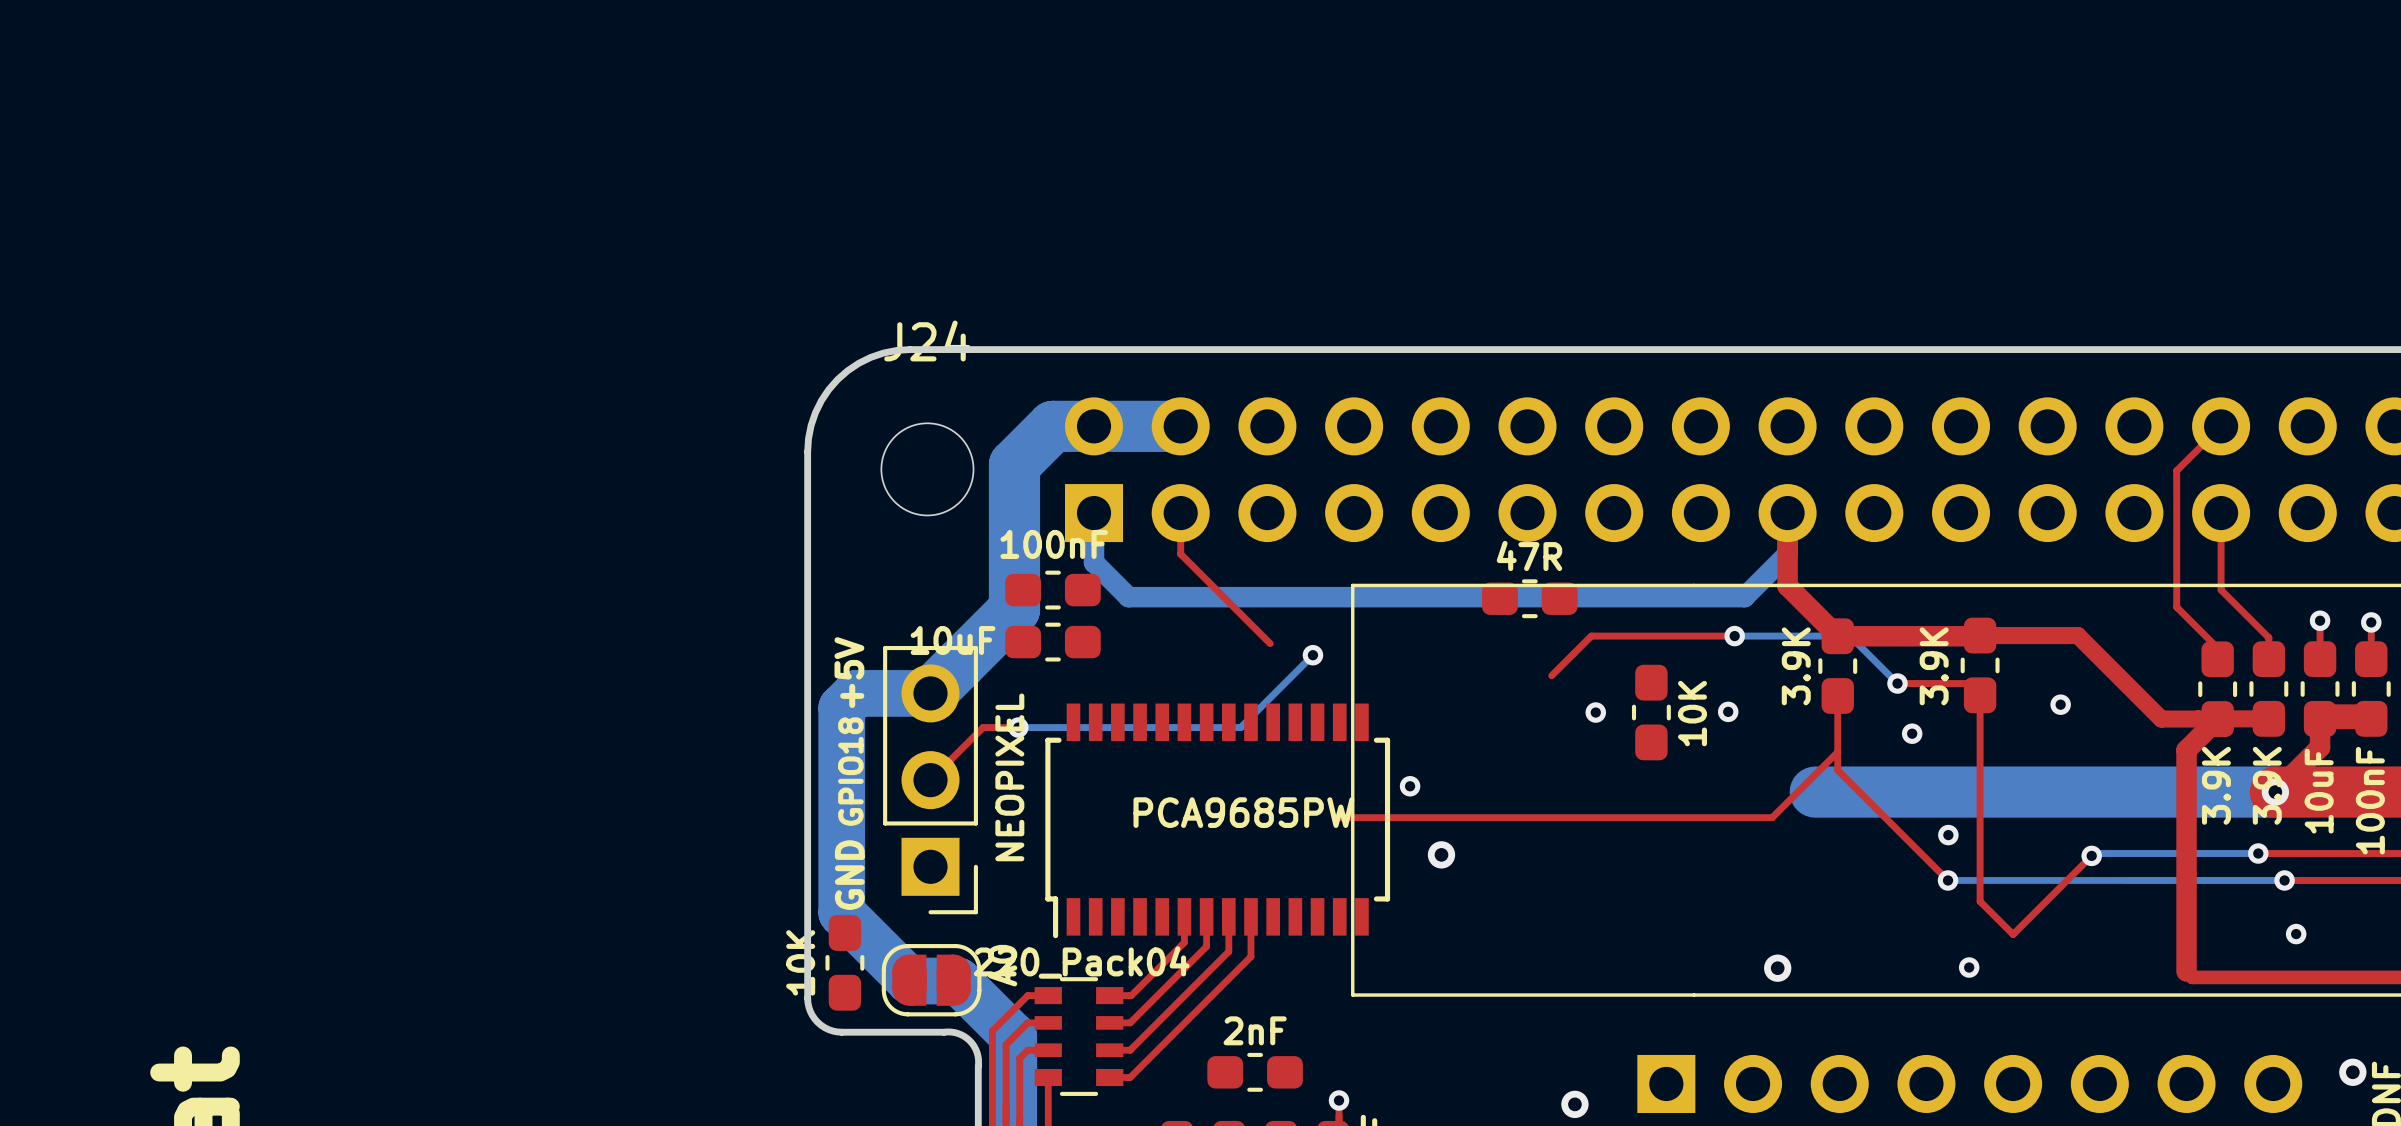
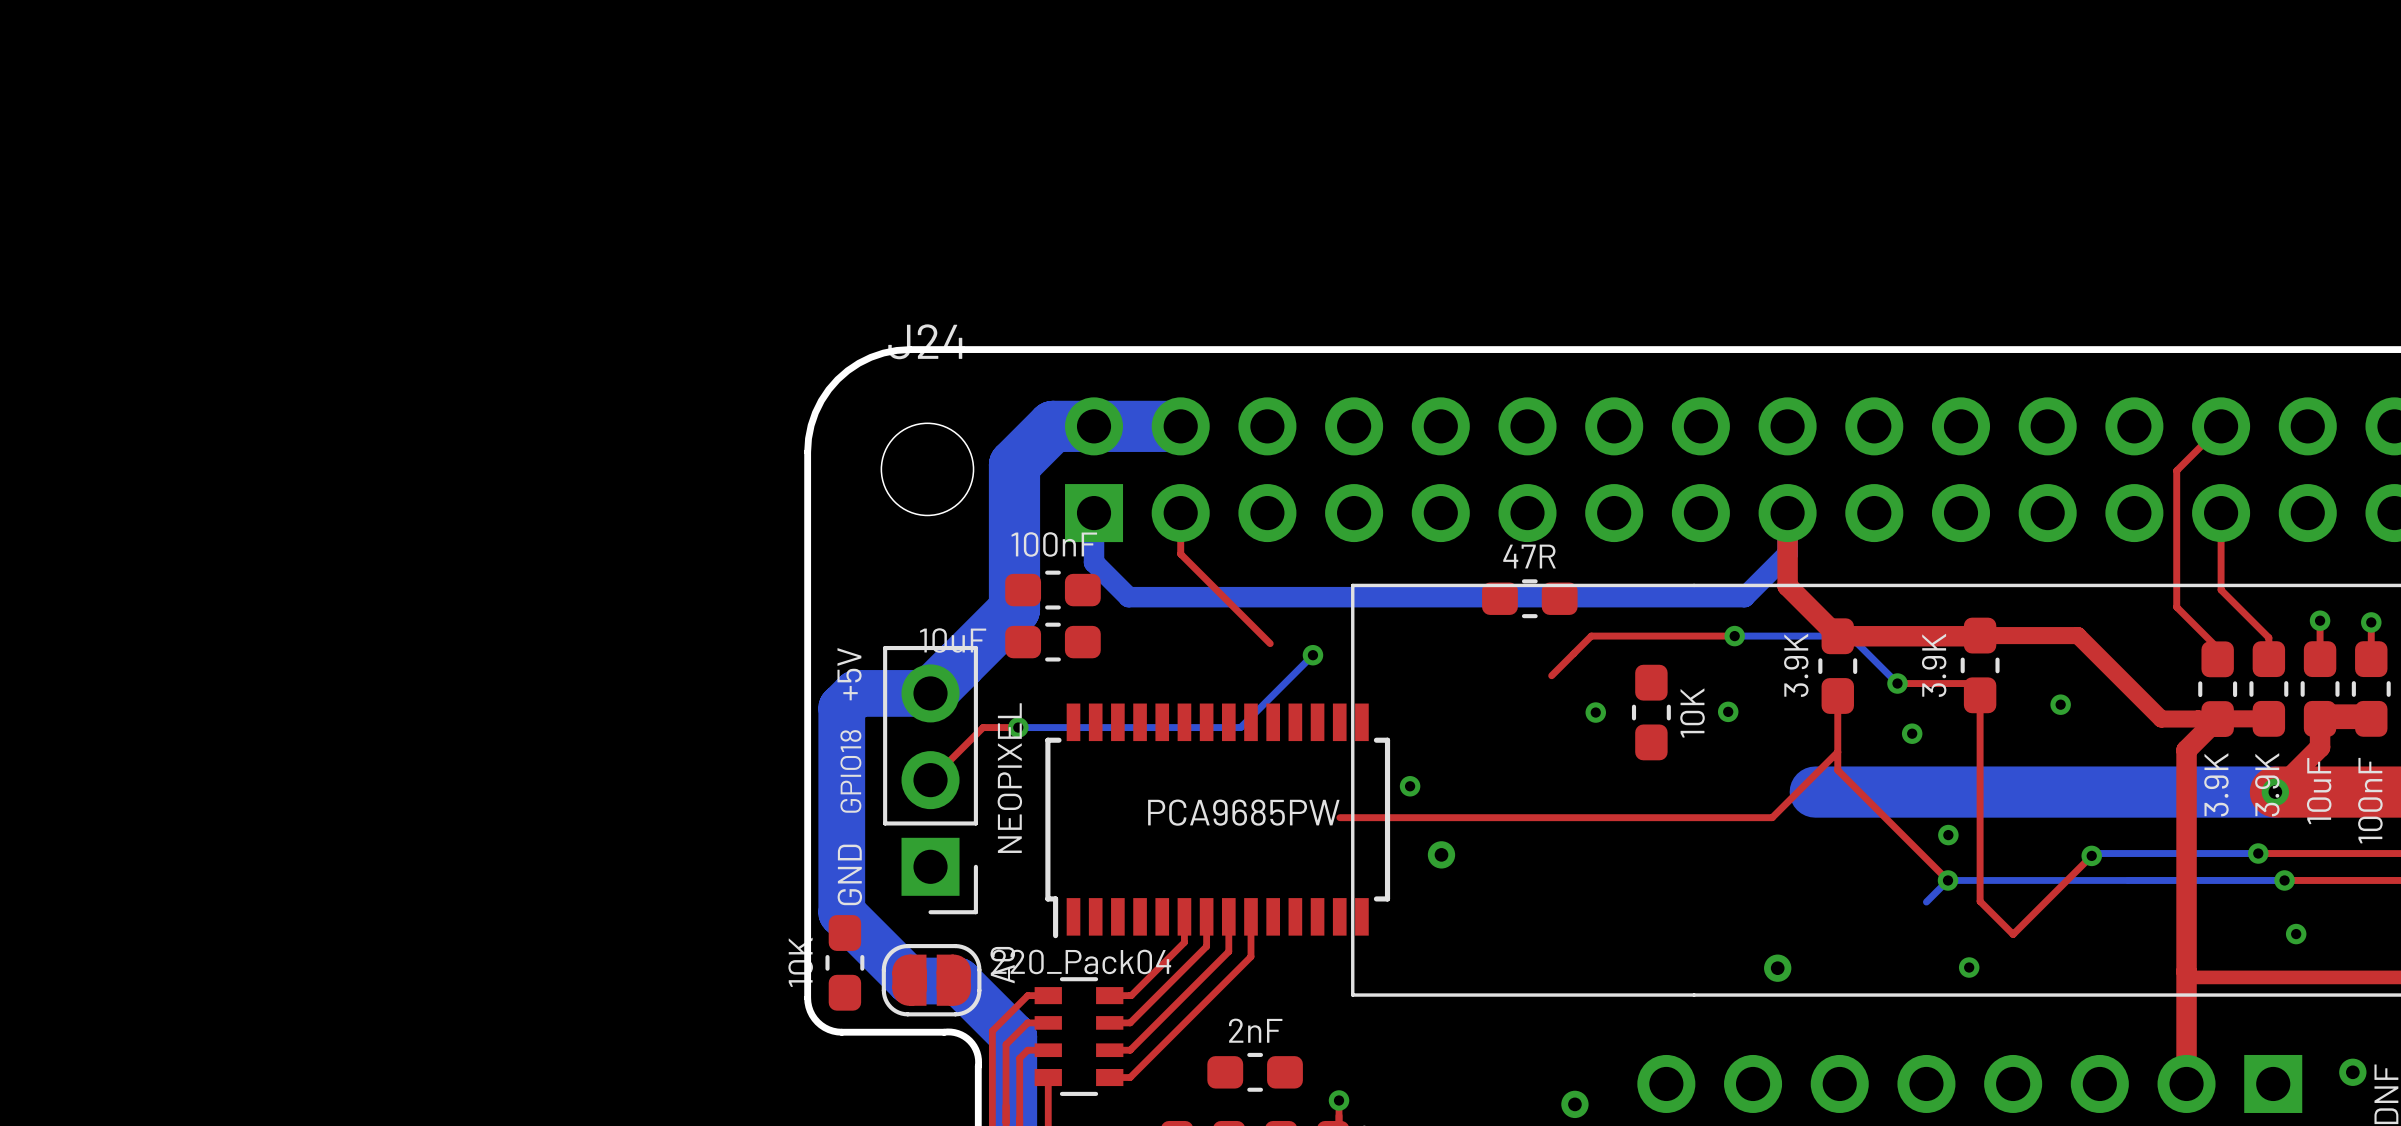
bottom track: none -> (1948, 880) (1926, 902)
top track: none -> (2186, 971) (2186, 1083)
part rotation: 0° (1969, 1083) -> 180° (1969, 1083)

